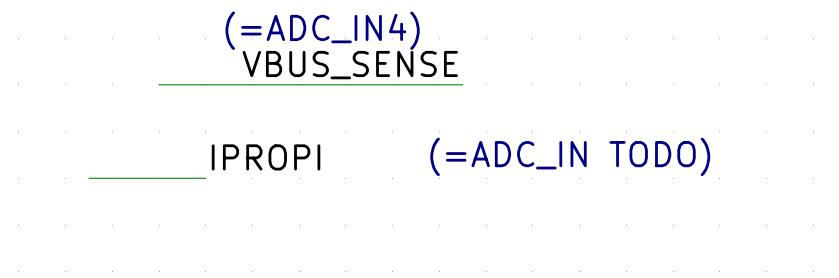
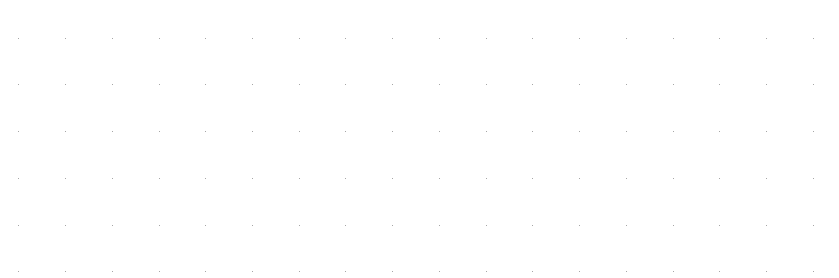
text: (=ADC_IN4) (322, 30) -> none
label: VBUS_SENSE (350, 65) -> none
wire: (159, 84) (462, 84) -> none
text: (=ADC_IN TODO) (570, 156) -> none
label: IPROPI (266, 157) -> none
wire: (88, 178) (205, 178) -> none

